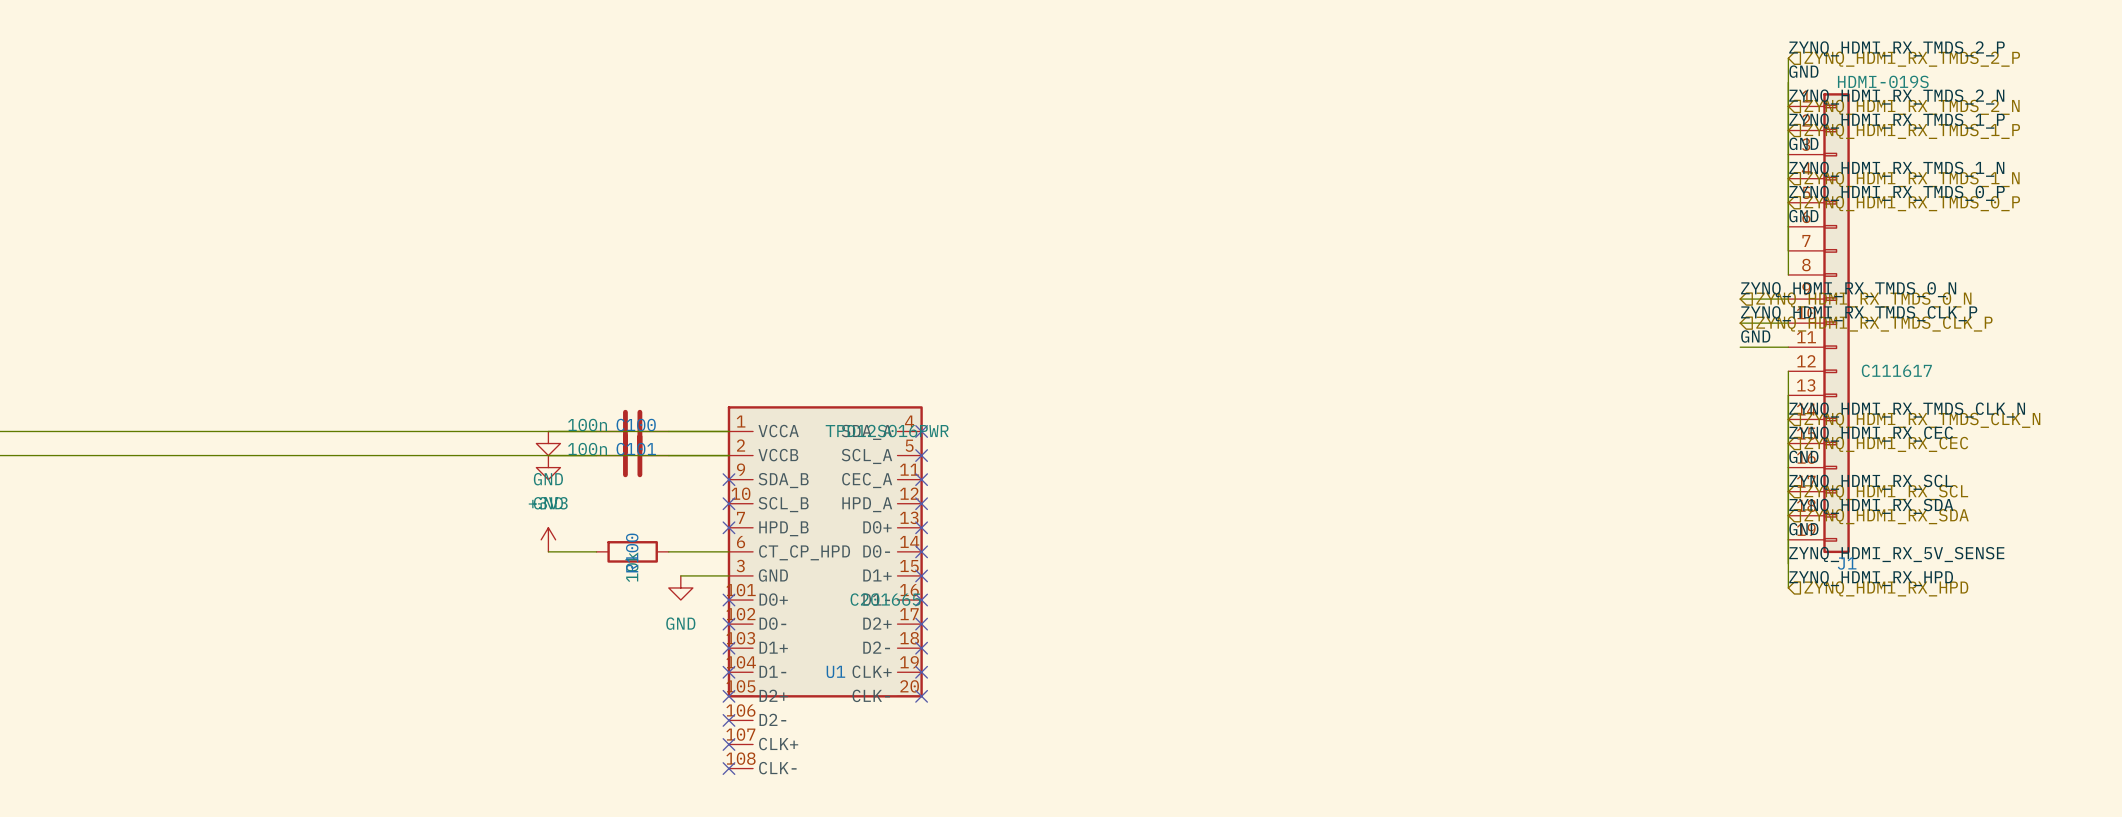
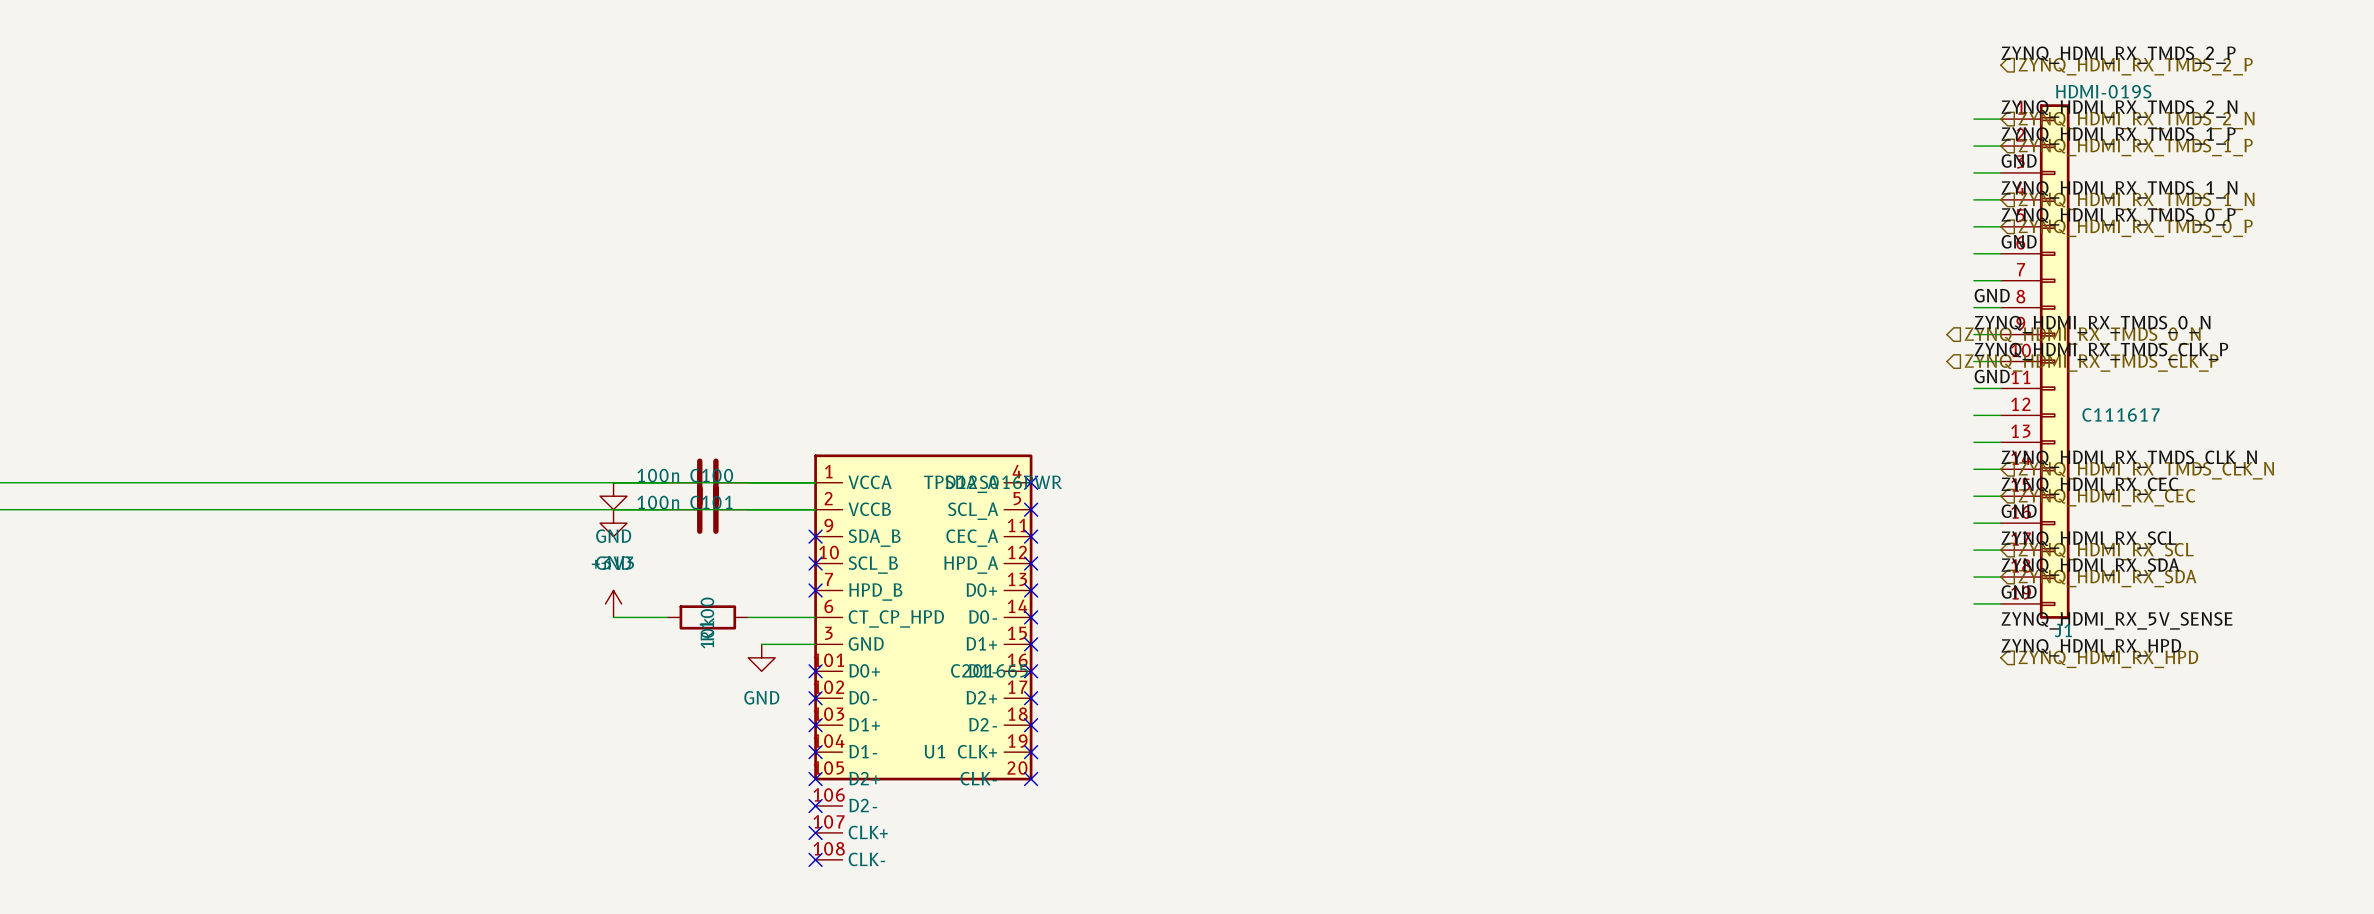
wire: (1788, 58) (1788, 274) -> (1973, 307) (2000, 307)
label: GND (1803, 71) -> none
wire: none -> (1973, 119) (2000, 119)
wire: none -> (1973, 146) (2000, 146)
wire: none -> (1973, 172) (2000, 172)
wire: none -> (1973, 199) (2000, 199)
wire: none -> (1973, 226) (2000, 226)
wire: none -> (1973, 280) (2000, 280)
label: none -> GND (1992, 295)
label position: ZYNQ_HDMI_RX_TMDS_0_N (1848, 289) -> ZYNQ_HDMI_RX_TMDS_0_N (2092, 324)
wire: (1740, 299) (1764, 299) -> (1973, 253) (2000, 253)
label position: ZYNQ_HDMI_RX_TMDS_CLK_P (1859, 313) -> ZYNQ_HDMI_RX_TMDS_CLK_P (2101, 351)
wire: (1740, 323) (1764, 323) -> (1973, 442) (2000, 442)
label position: GND (1755, 336) -> GND (1992, 376)
wire: (1740, 347) (1764, 347) -> (1973, 469) (2000, 469)
wire: (1788, 371) (1788, 587) -> (2000, 415) (1973, 415)
wire: none -> (1973, 496) (2000, 496)
wire: none -> (1973, 523) (2000, 523)
wire: none -> (1973, 550) (2000, 550)
wire: none -> (1973, 577) (2000, 577)
wire: none -> (1973, 603) (2000, 603)

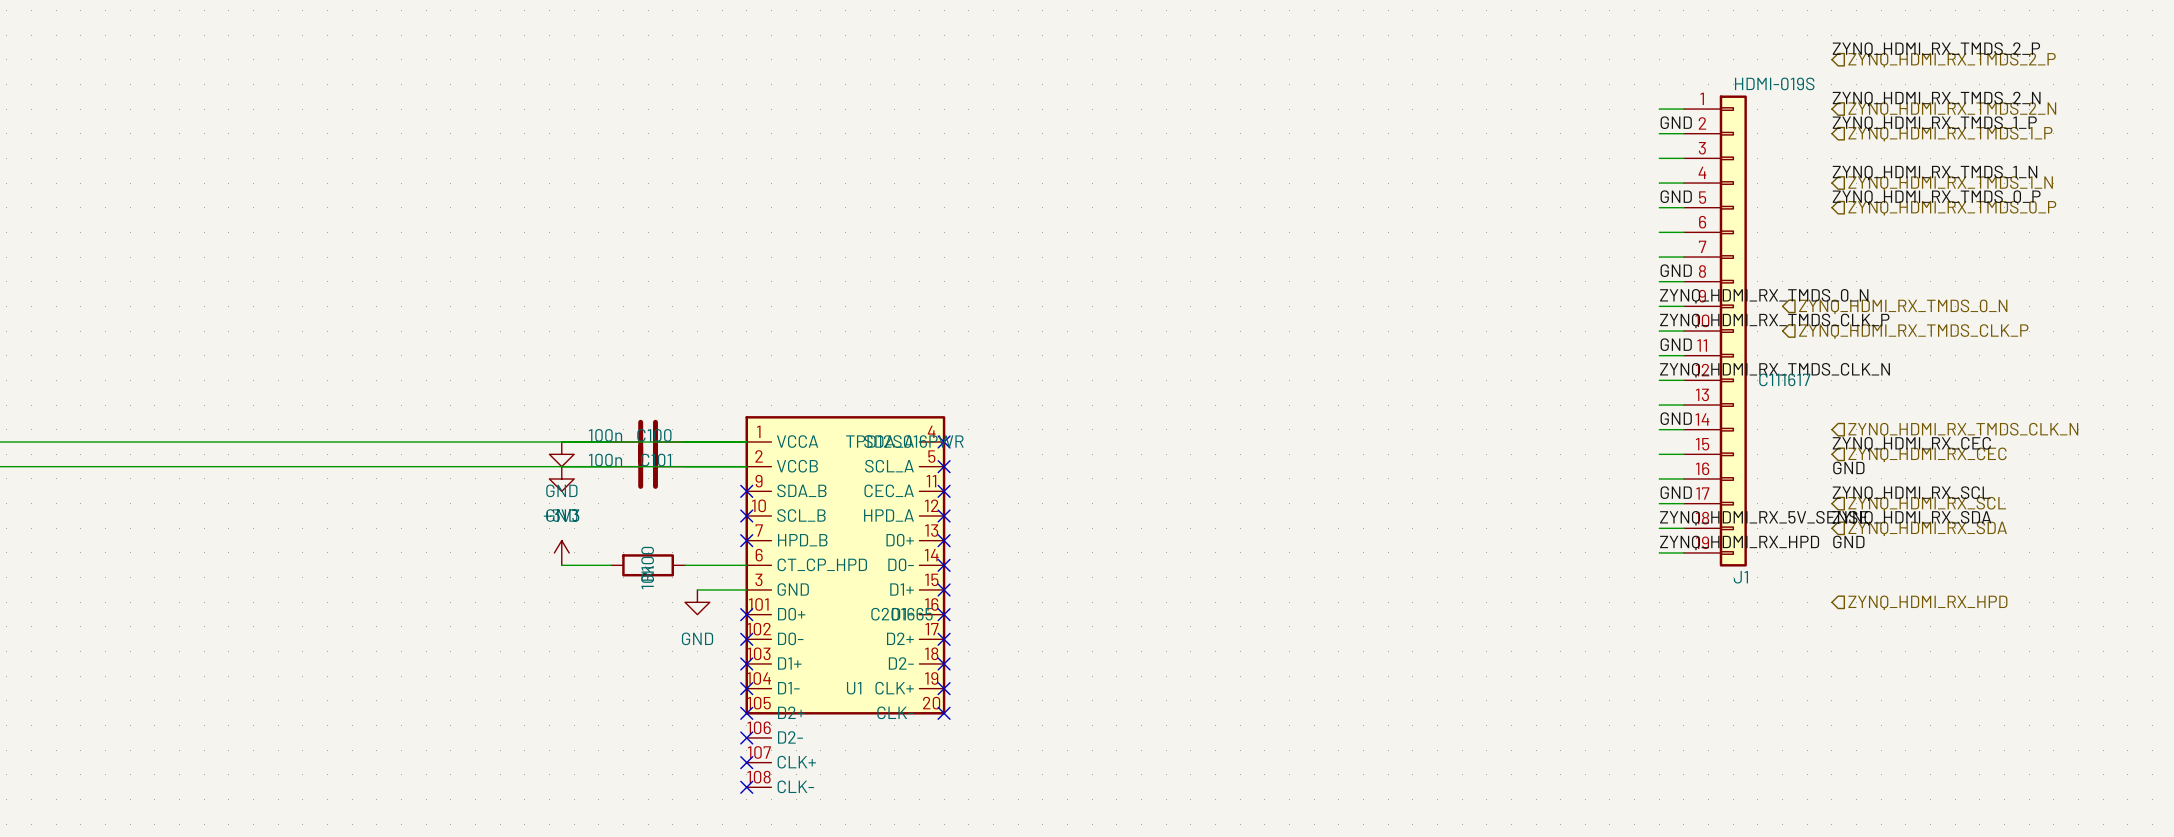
wire: (1973, 119) (2000, 119) -> (1659, 109) (1683, 109)
label: none -> GND (1676, 122)
wire: (1973, 146) (2000, 146) -> (1659, 133) (1683, 133)
label: GND (2019, 161) -> none
wire: (1973, 172) (2000, 172) -> (1659, 158) (1683, 158)
wire: (1973, 199) (2000, 199) -> (1659, 183) (1683, 183)
label: none -> GND (1676, 196)
wire: (1973, 226) (2000, 226) -> (1659, 207) (1683, 207)
label: GND (2019, 241) -> none
wire: (1973, 253) (2000, 253) -> (1659, 232) (1683, 232)
wire: (1973, 280) (2000, 280) -> (1659, 257) (1683, 257)
label: none -> GND (1676, 270)
label: GND (1992, 295) -> none
wire: (1973, 307) (2000, 307) -> (1659, 281) (1683, 281)
label position: ZYNQ_HDMI_RX_TMDS_0_N (2092, 324) -> ZYNQ_HDMI_RX_TMDS_0_N (1764, 296)
wire: (1973, 334) (2000, 334) -> (1659, 306) (1683, 306)
label position: ZYNQ_HDMI_RX_TMDS_CLK_P (2101, 351) -> ZYNQ_HDMI_RX_TMDS_CLK_P (1774, 320)
wire: (1973, 361) (2000, 361) -> (1659, 331) (1683, 331)
J1 position: (2035, 361) -> (1715, 331)
label: none -> GND (1676, 344)
label: GND (1992, 376) -> none
wire: (1973, 388) (2000, 388) -> (1659, 355) (1683, 355)
wire: (1973, 415) (2000, 415) -> (1659, 380) (1683, 380)
wire: (1973, 442) (2000, 442) -> (1659, 405) (1683, 405)
label: none -> GND (1676, 418)
label position: ZYNQ_HDMI_RX_TMDS_CLK_N (2129, 459) -> ZYNQ_HDMI_RX_TMDS_CLK_N (1775, 370)
wire: (1973, 469) (2000, 469) -> (1659, 429) (1683, 429)
wire: (1973, 496) (2000, 496) -> (1659, 454) (1683, 454)
wire: (1973, 523) (2000, 523) -> (1659, 478) (1683, 478)
label: none -> GND (1676, 492)
wire: (1973, 550) (2000, 550) -> (1659, 503) (1683, 503)
wire: (1973, 577) (2000, 577) -> (1659, 528) (1683, 528)
wire: (1973, 603) (2000, 603) -> (1659, 552) (1683, 552)
label position: ZYNQ_HDMI_RX_5V_SENSE (2116, 620) -> ZYNQ_HDMI_RX_5V_SENSE (1764, 518)
label position: ZYNQ_HDMI_RX_HPD (2091, 647) -> ZYNQ_HDMI_RX_HPD (1739, 542)

